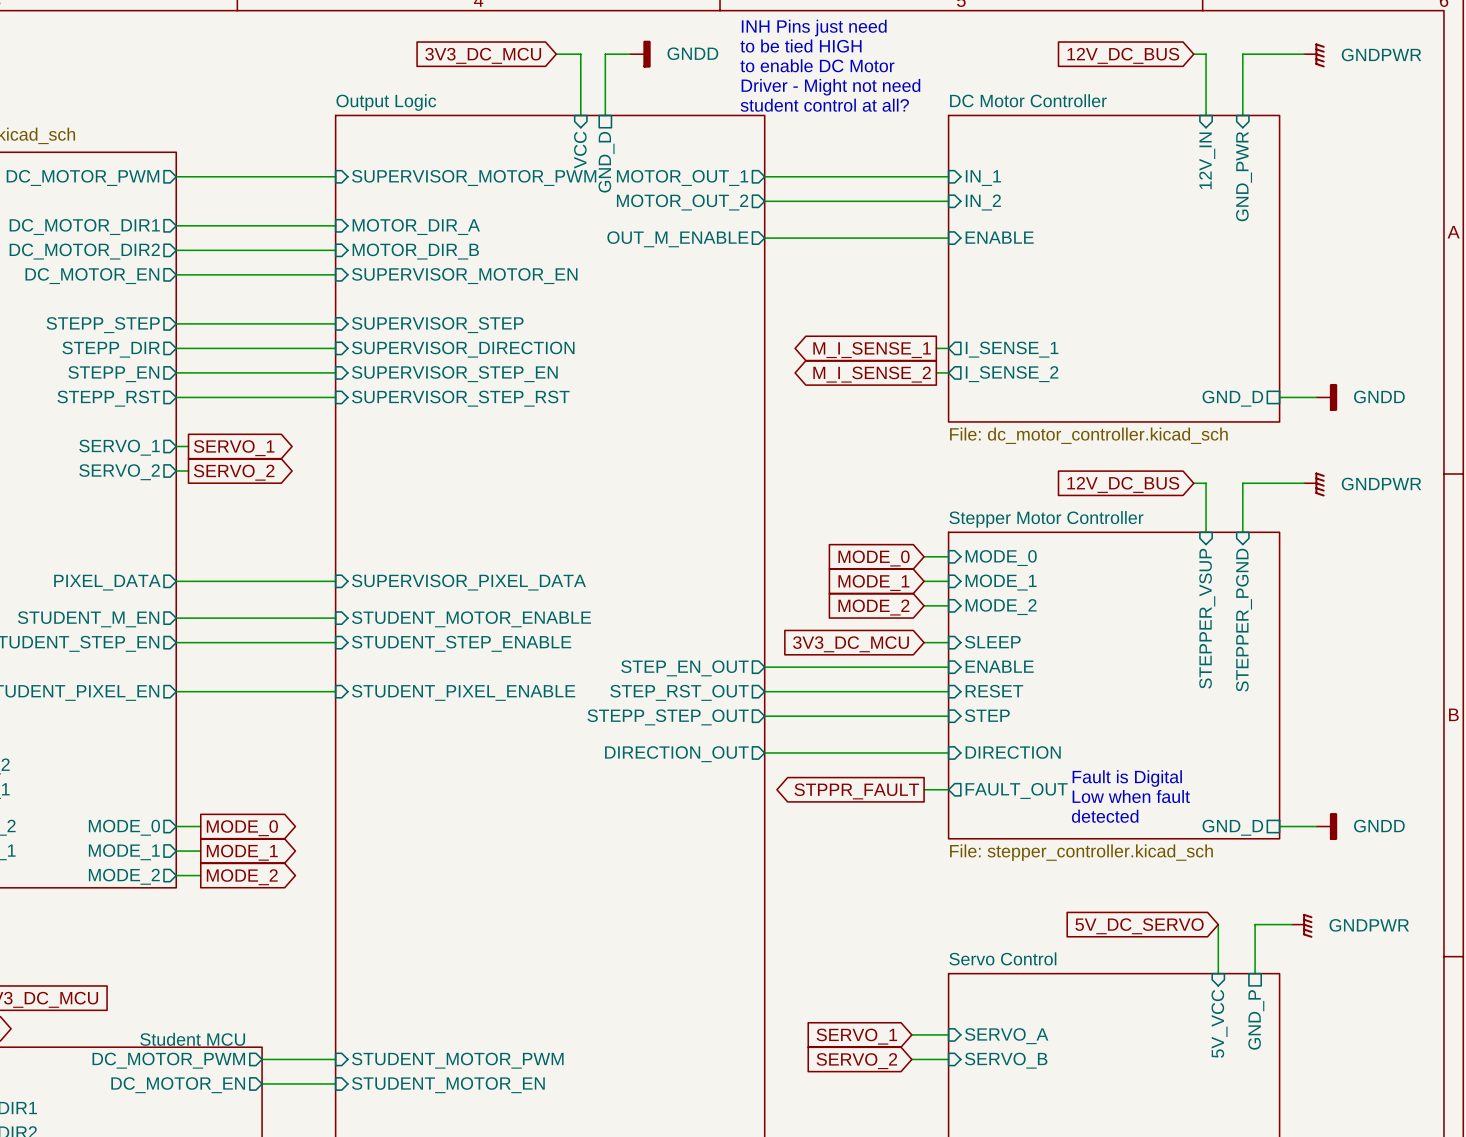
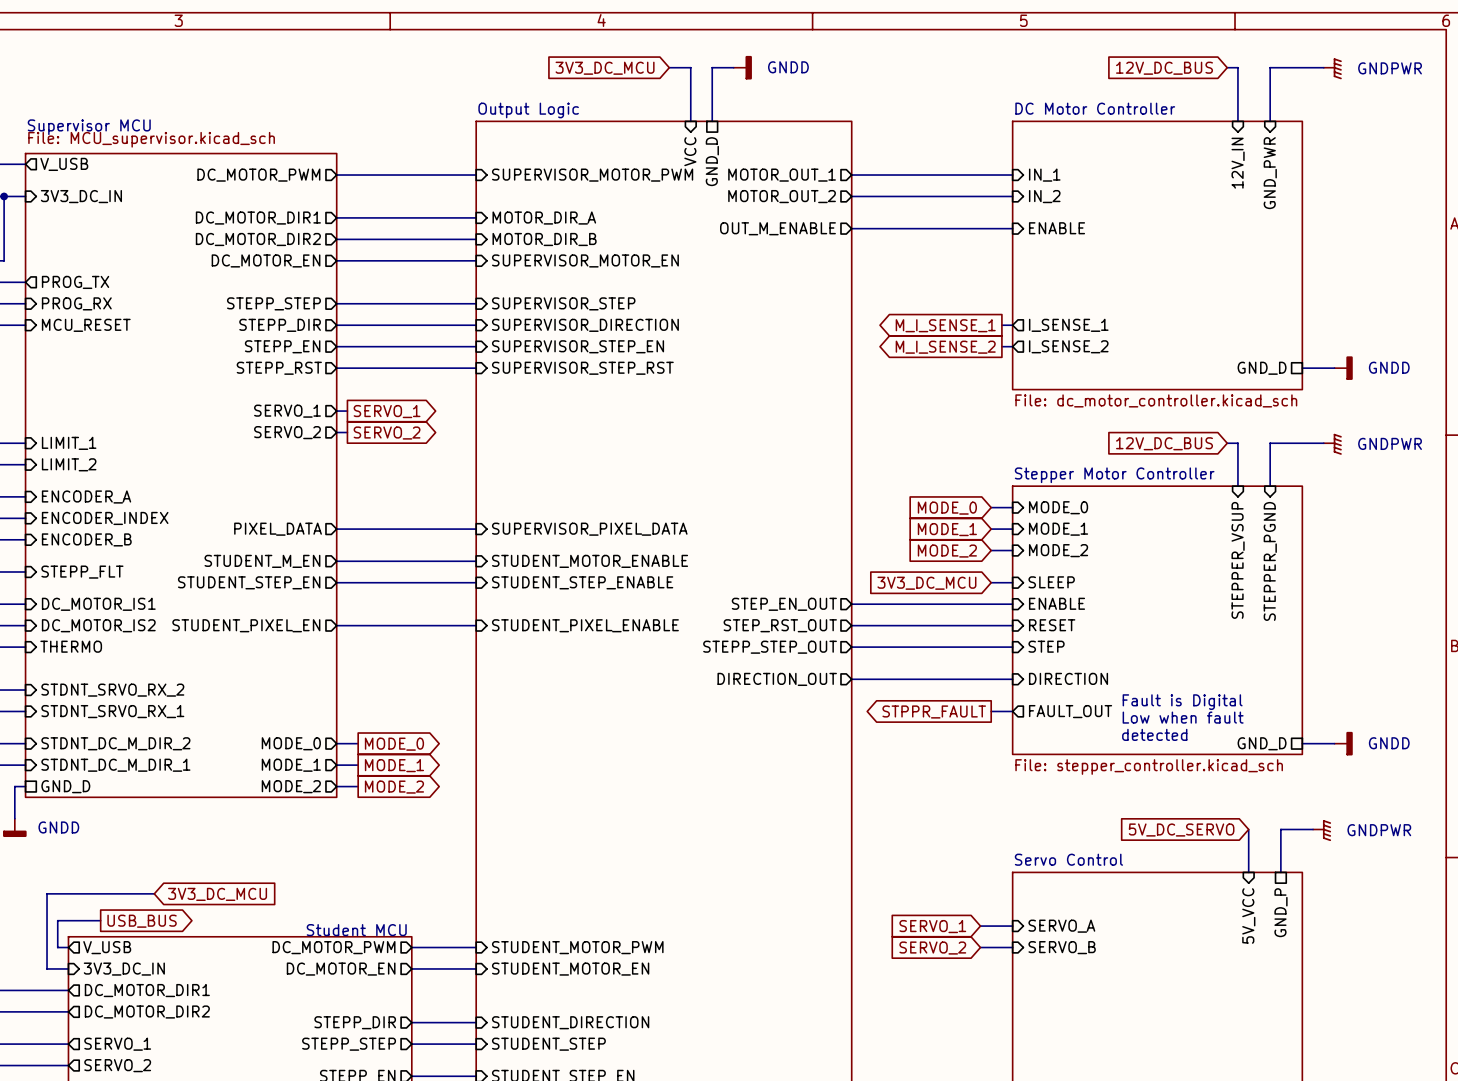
text: INH Pins just need (814, 28) -> none
text: to be tied HIGH (800, 45) -> none
text: to enable DC Motor (817, 65) -> none
text: Driver - Might not need (830, 87) -> none
text: student control at all? (824, 105) -> none

